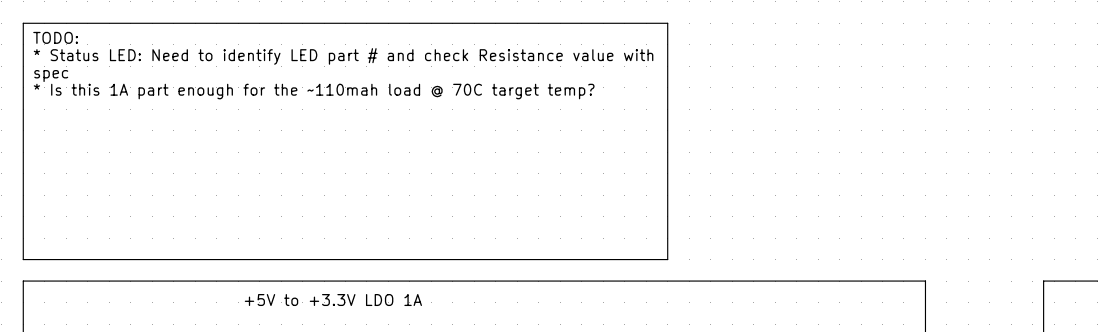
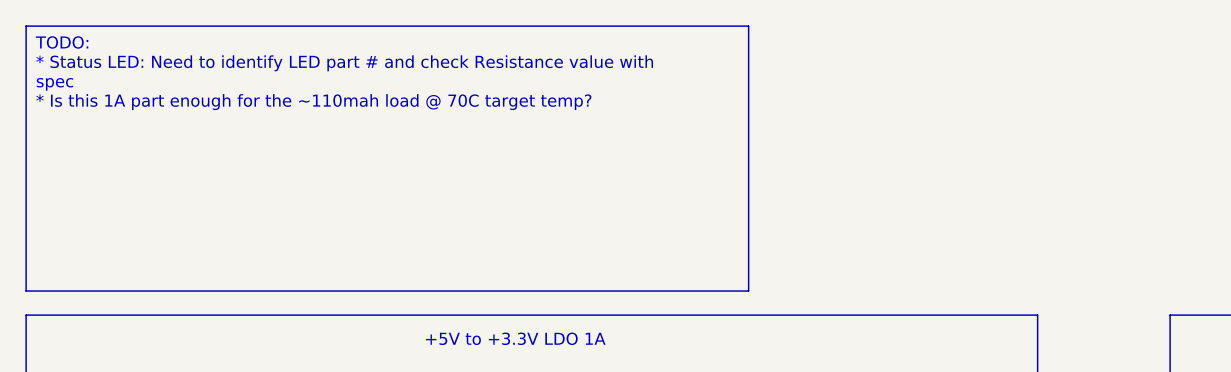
text position: +5V to +3.3V LDO 1A (333, 300) -> +5V to +3.3V LDO 1A (515, 338)

